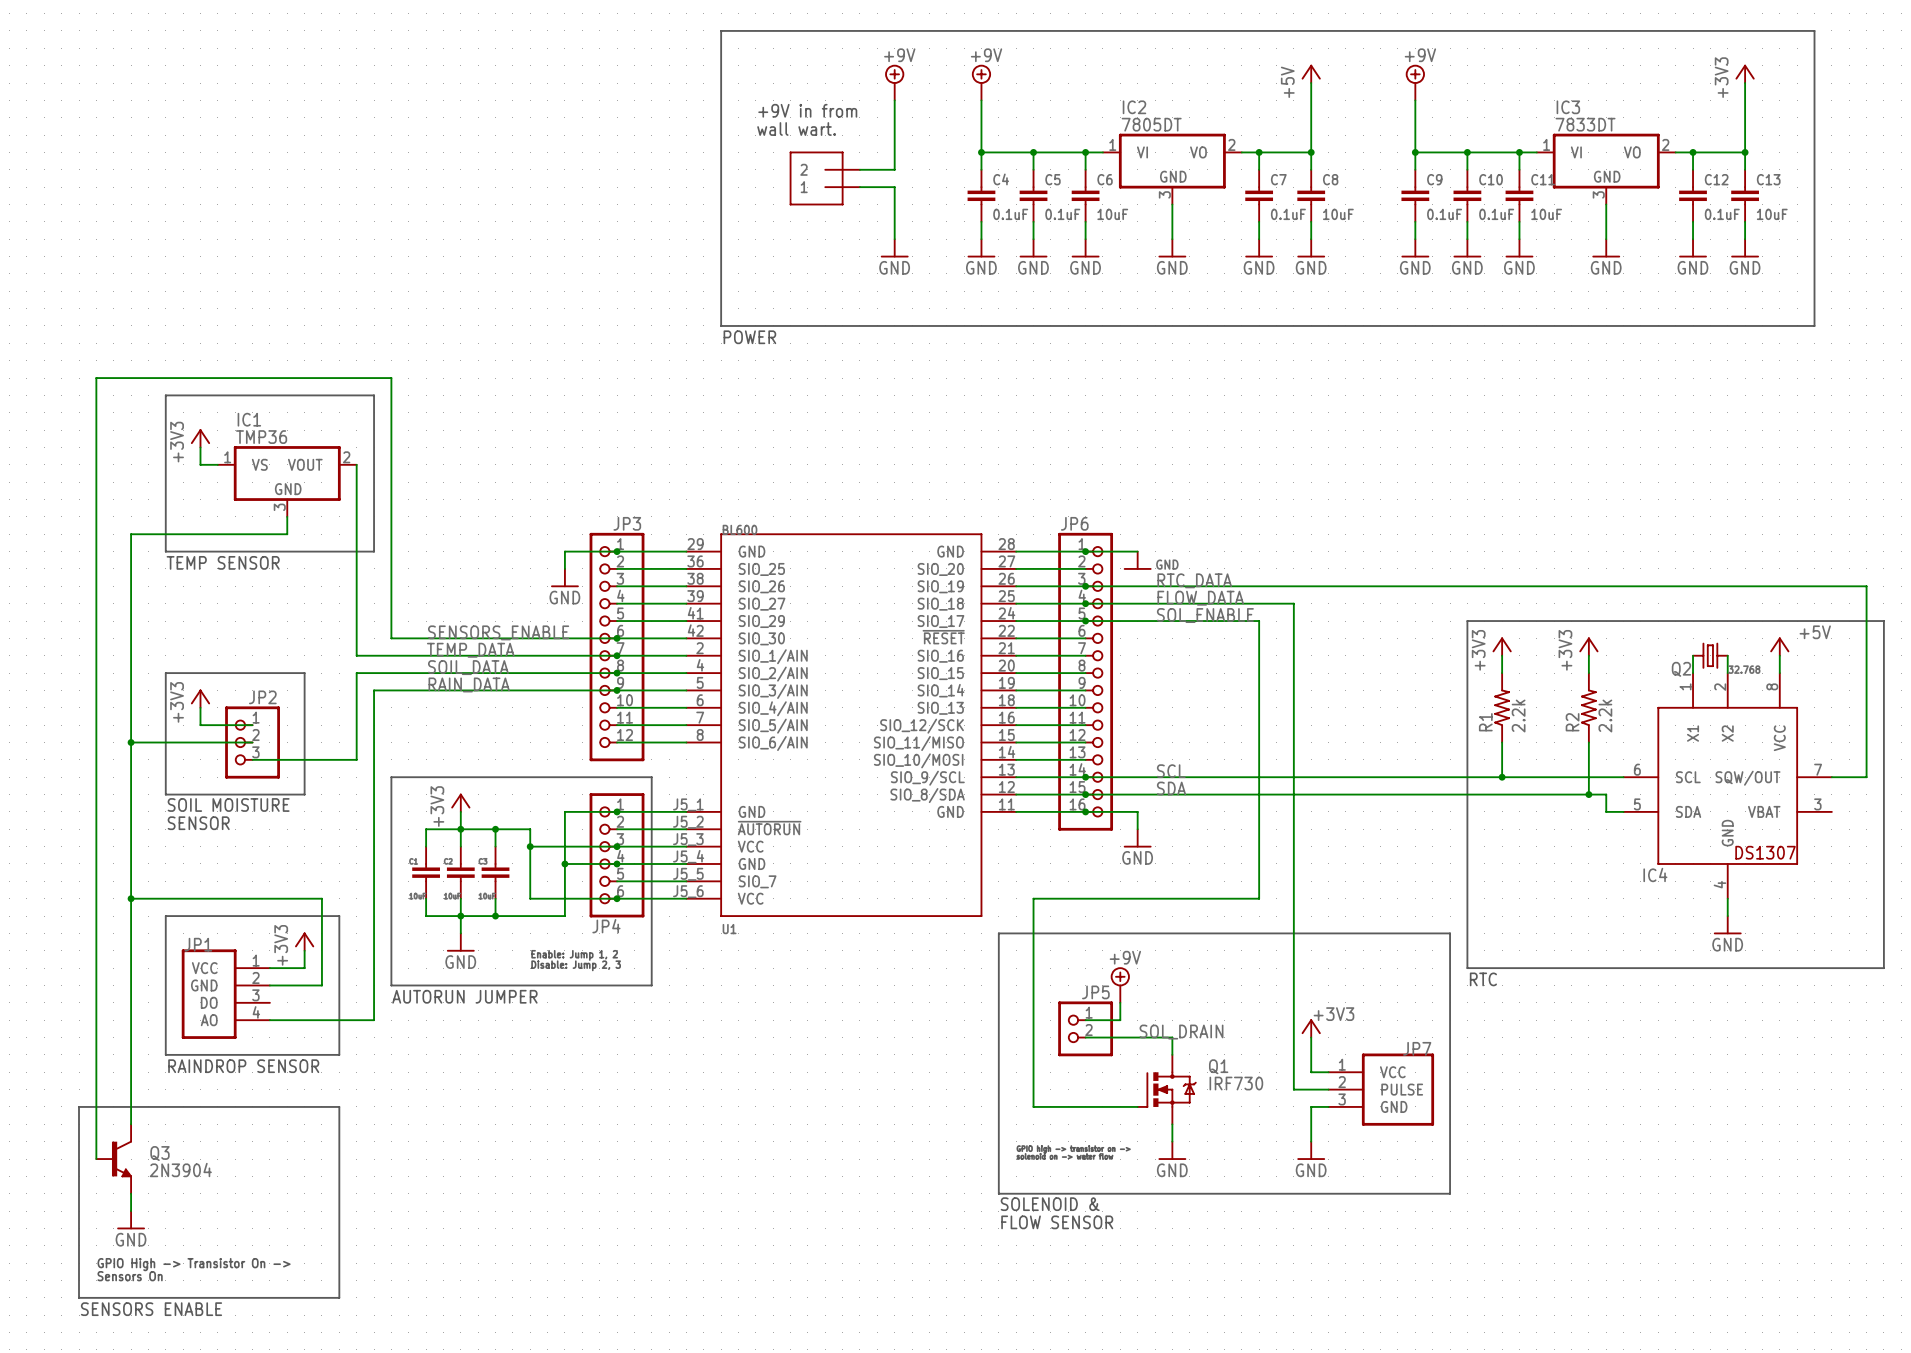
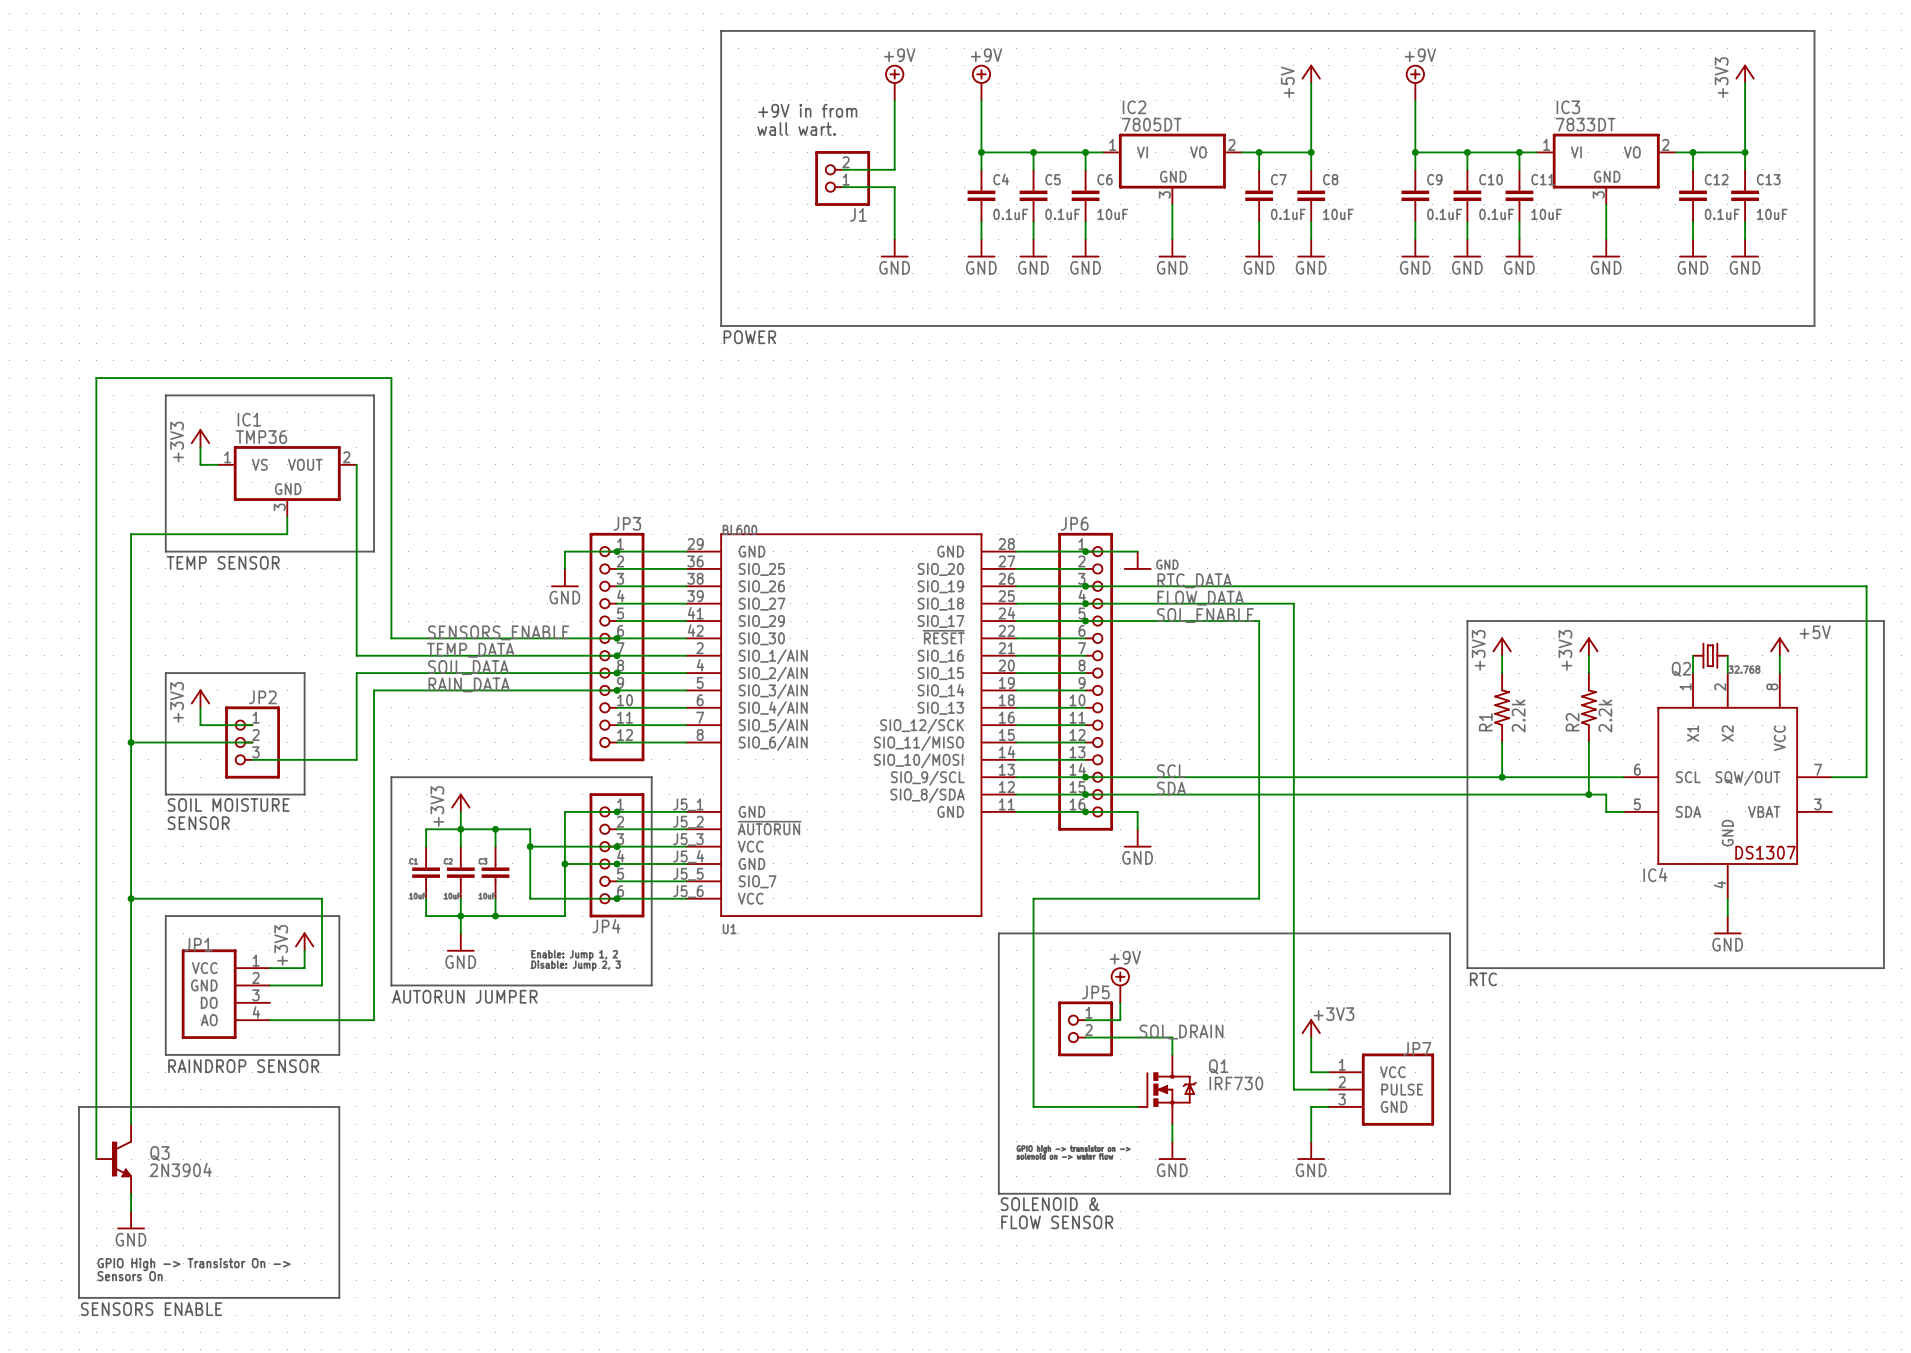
part: (824, 178) -> none
J1: none -> (842, 178)

